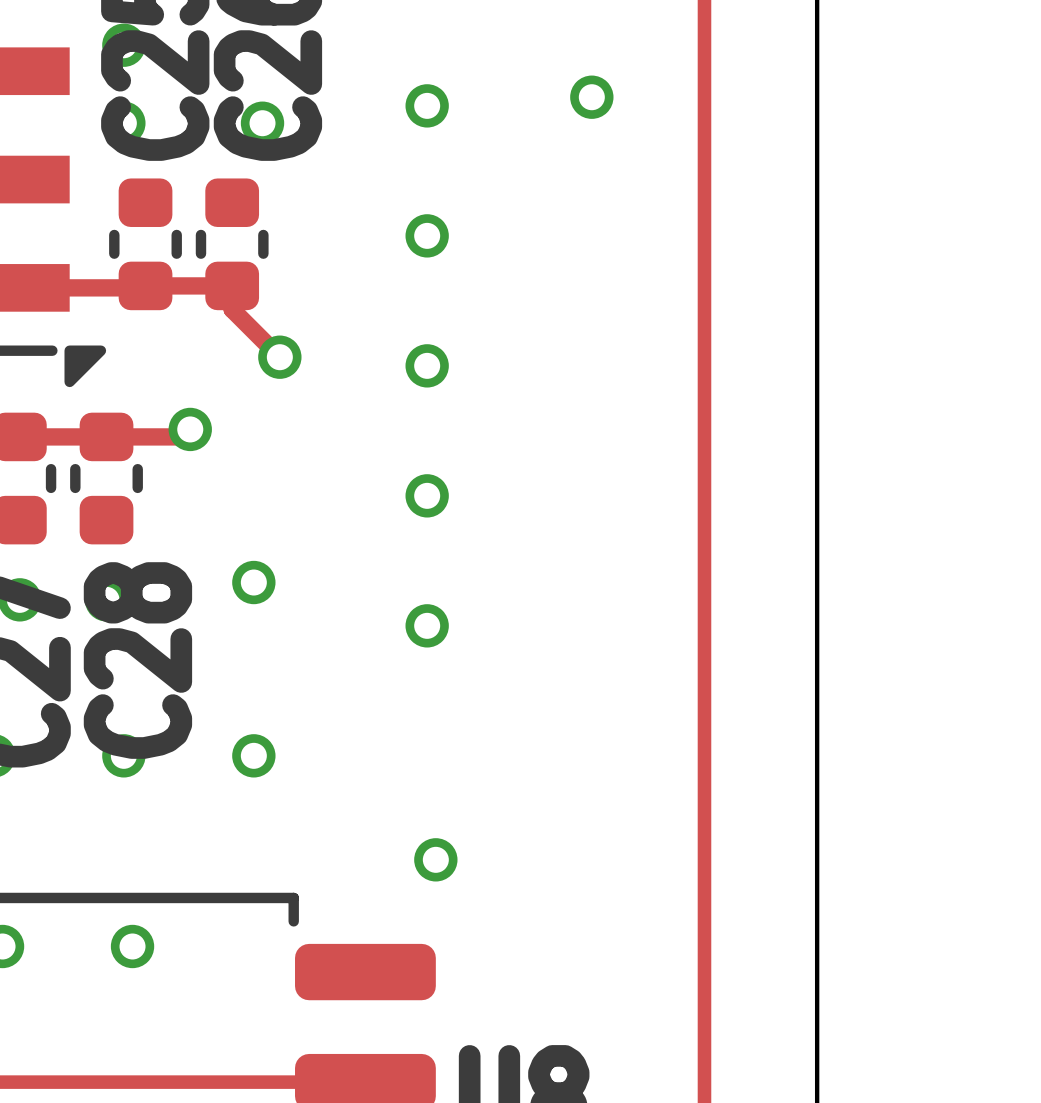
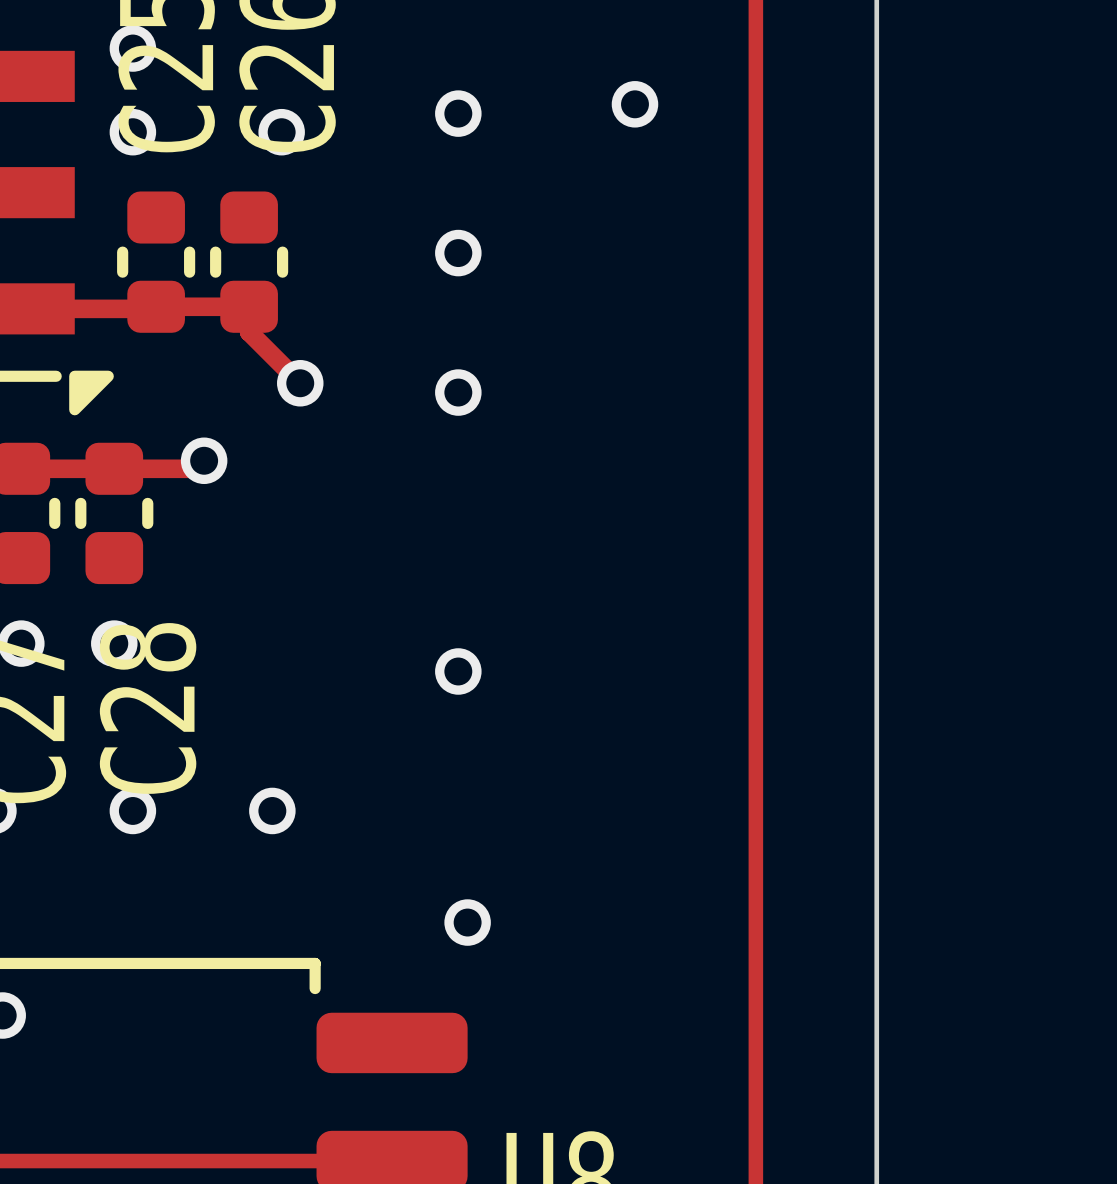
via: (427, 495) -> none
via: (253, 582) -> none
via: (132, 946) -> none

